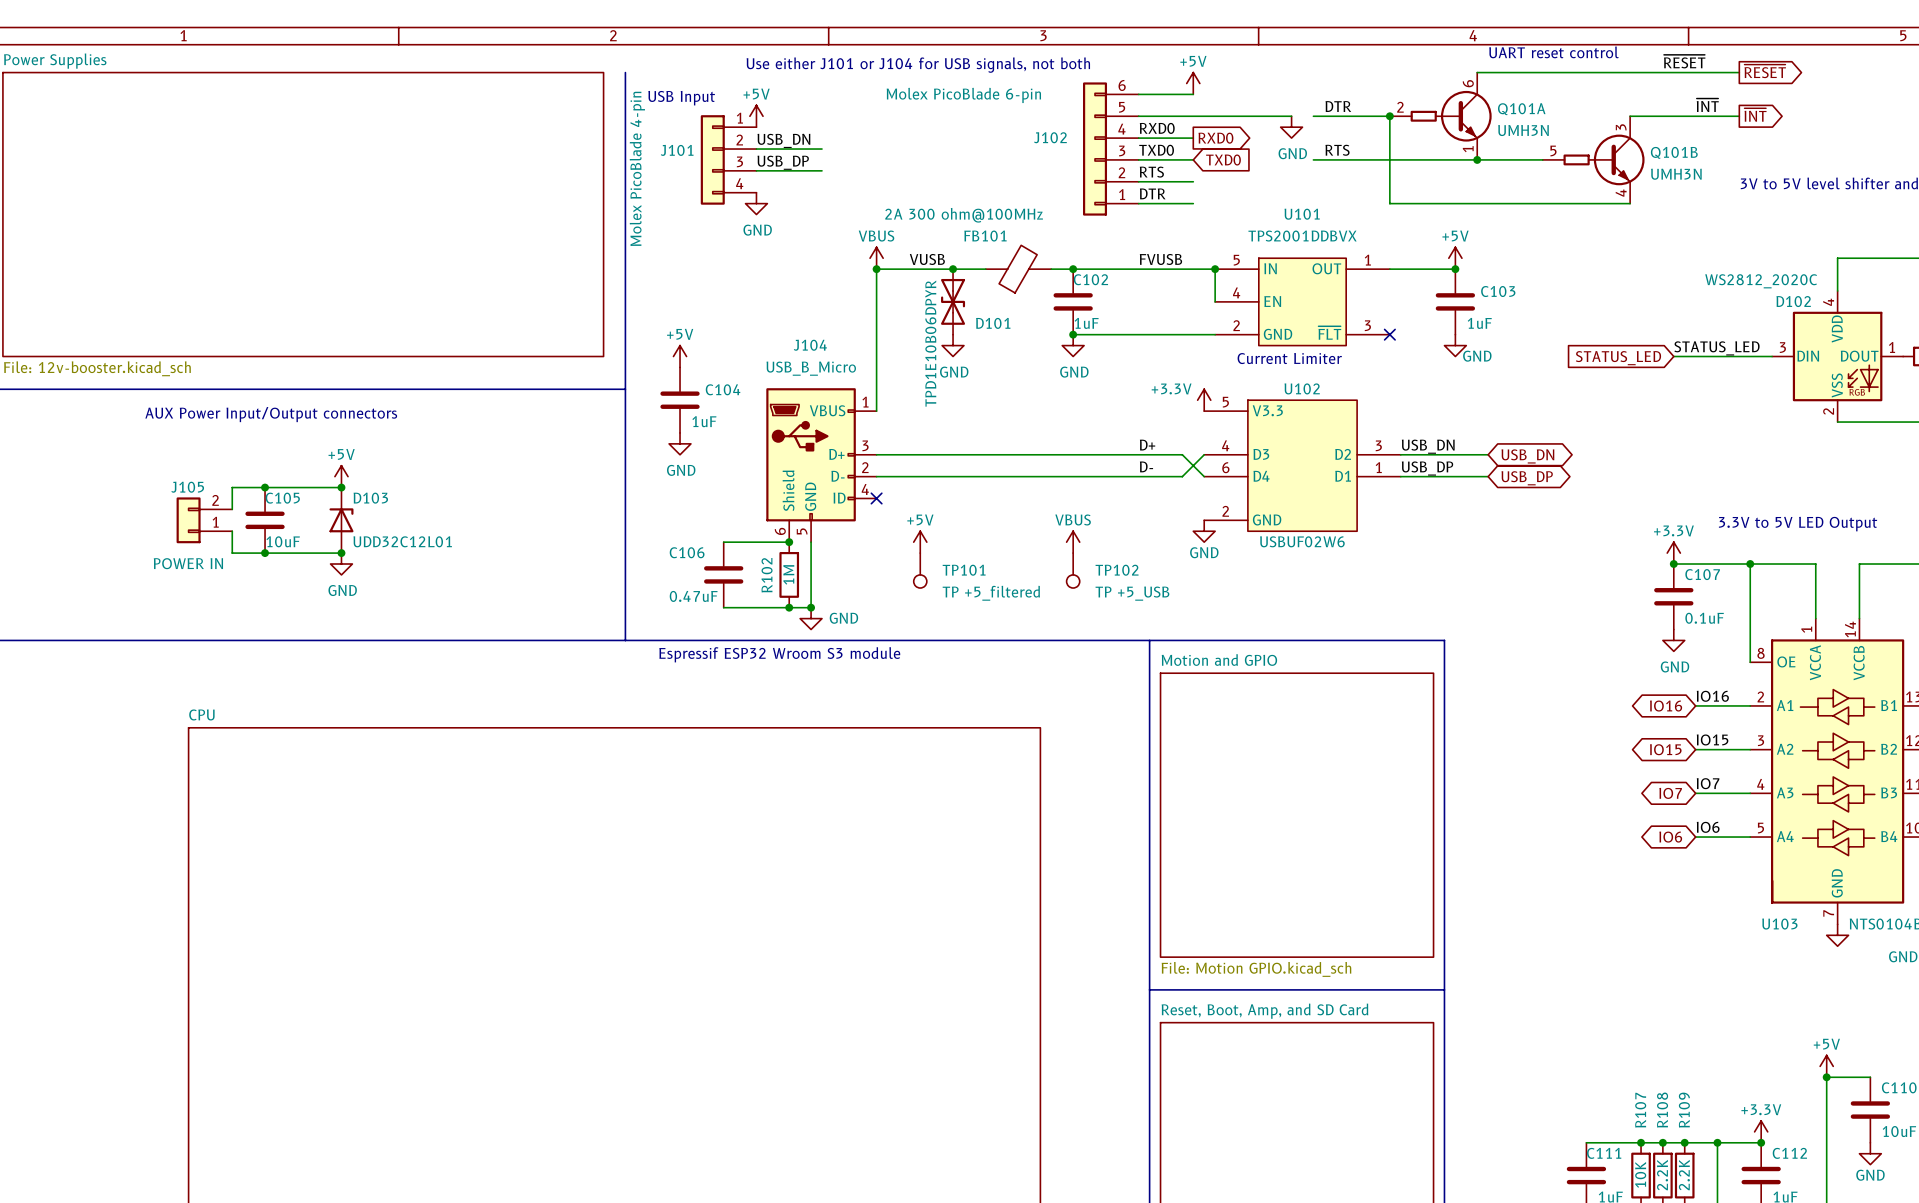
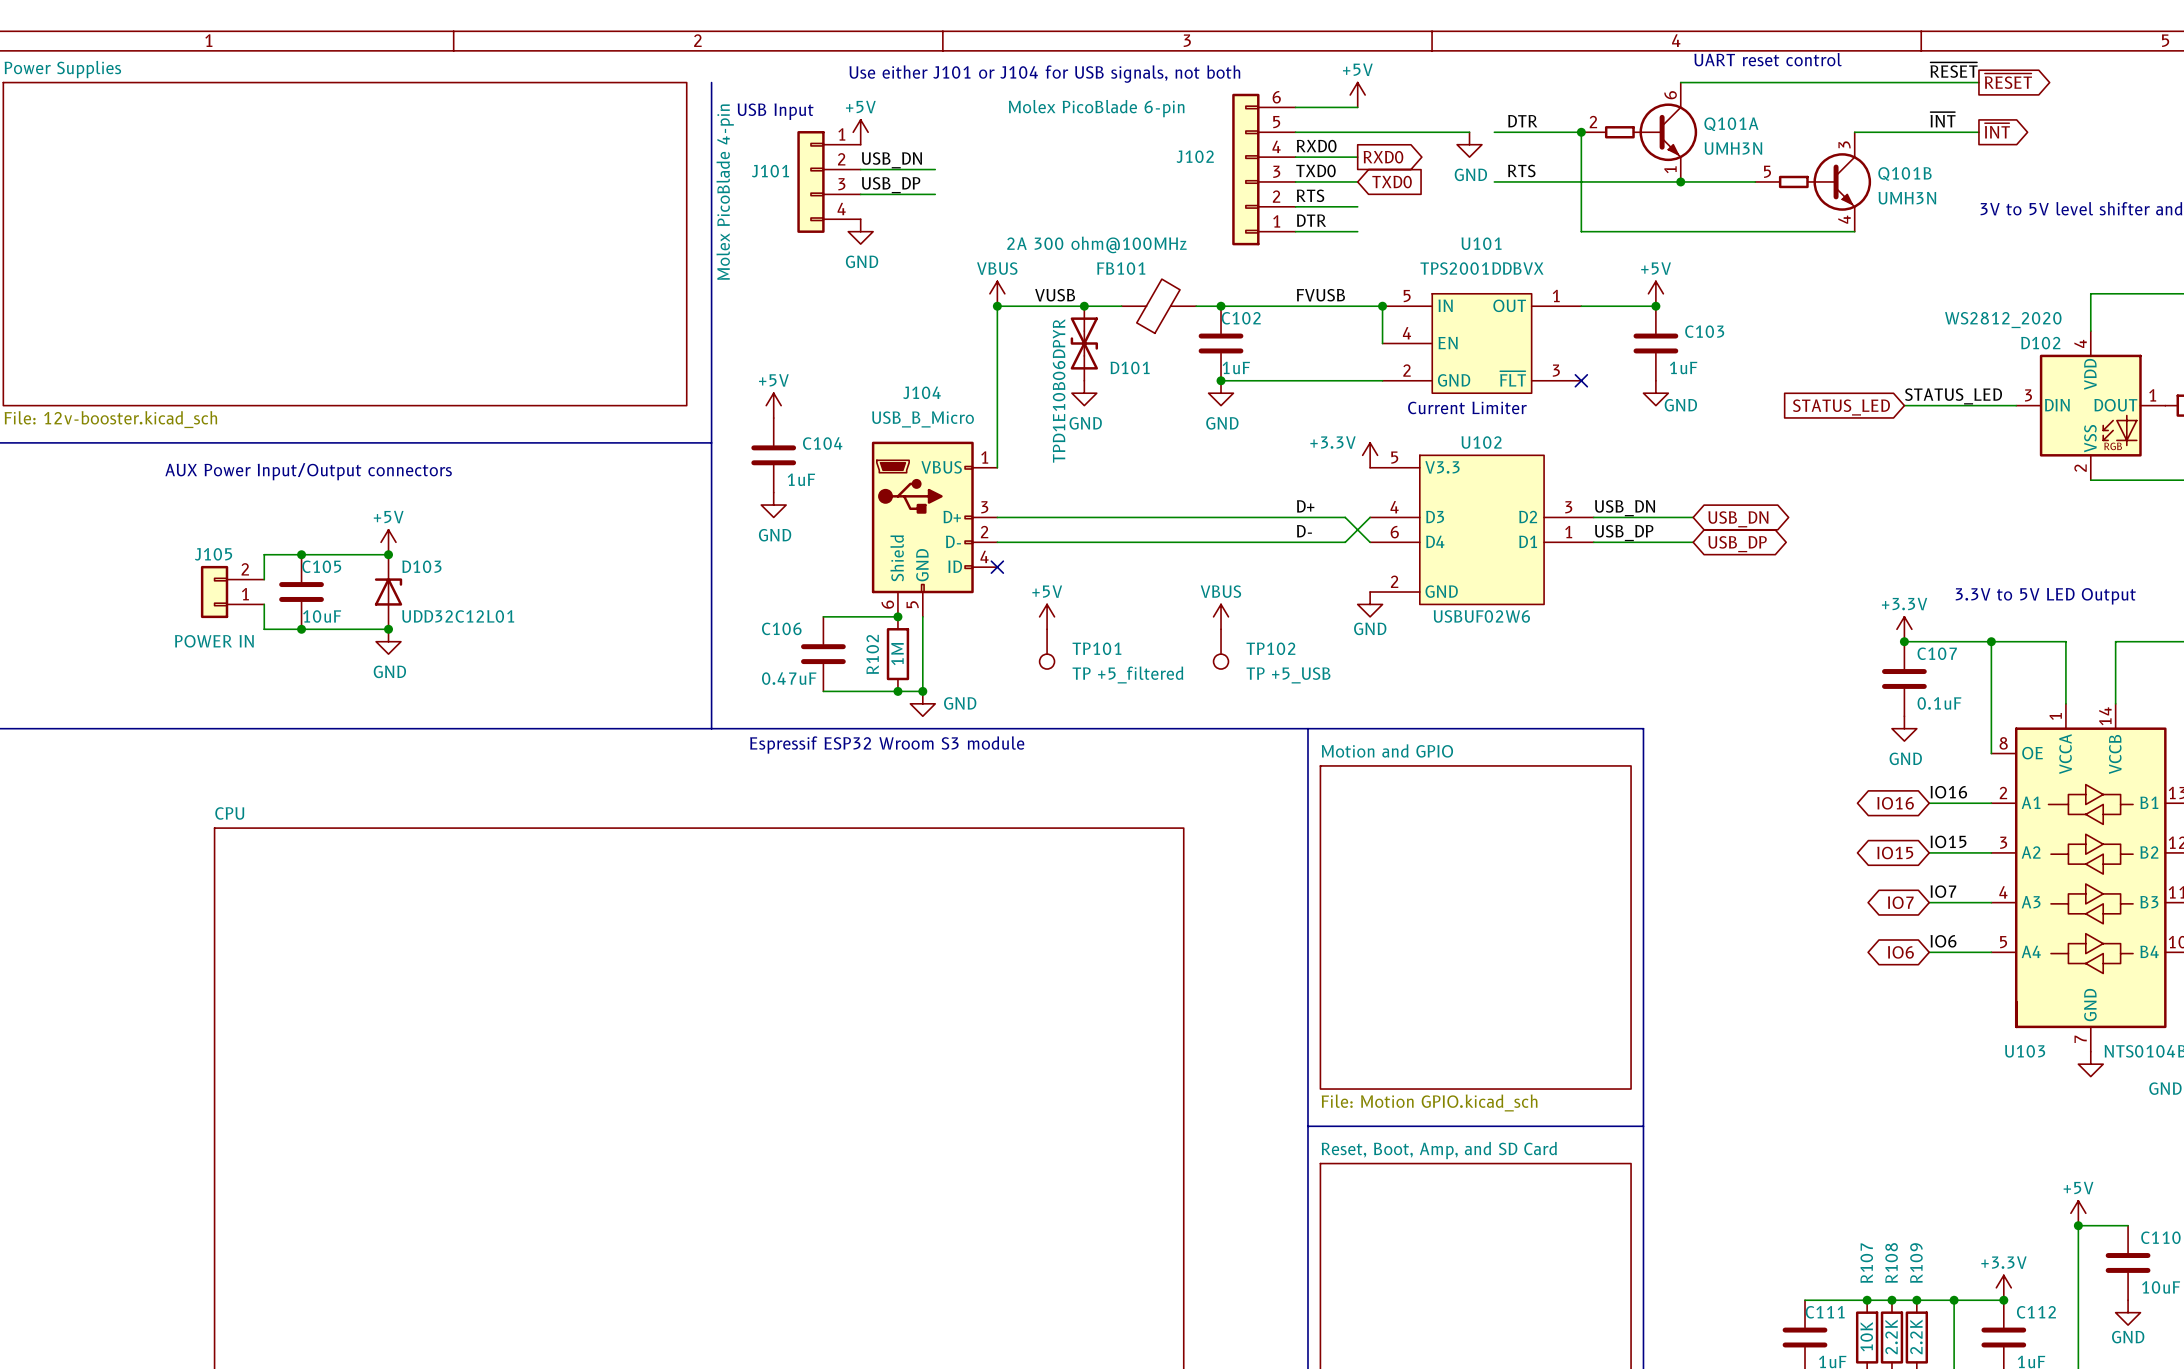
label position: ~{RESET} (1684, 61) -> ~{RESET} (1954, 70)
D102 value: WS2812_2020C (1761, 281) -> WS2812_2020 (2003, 320)

